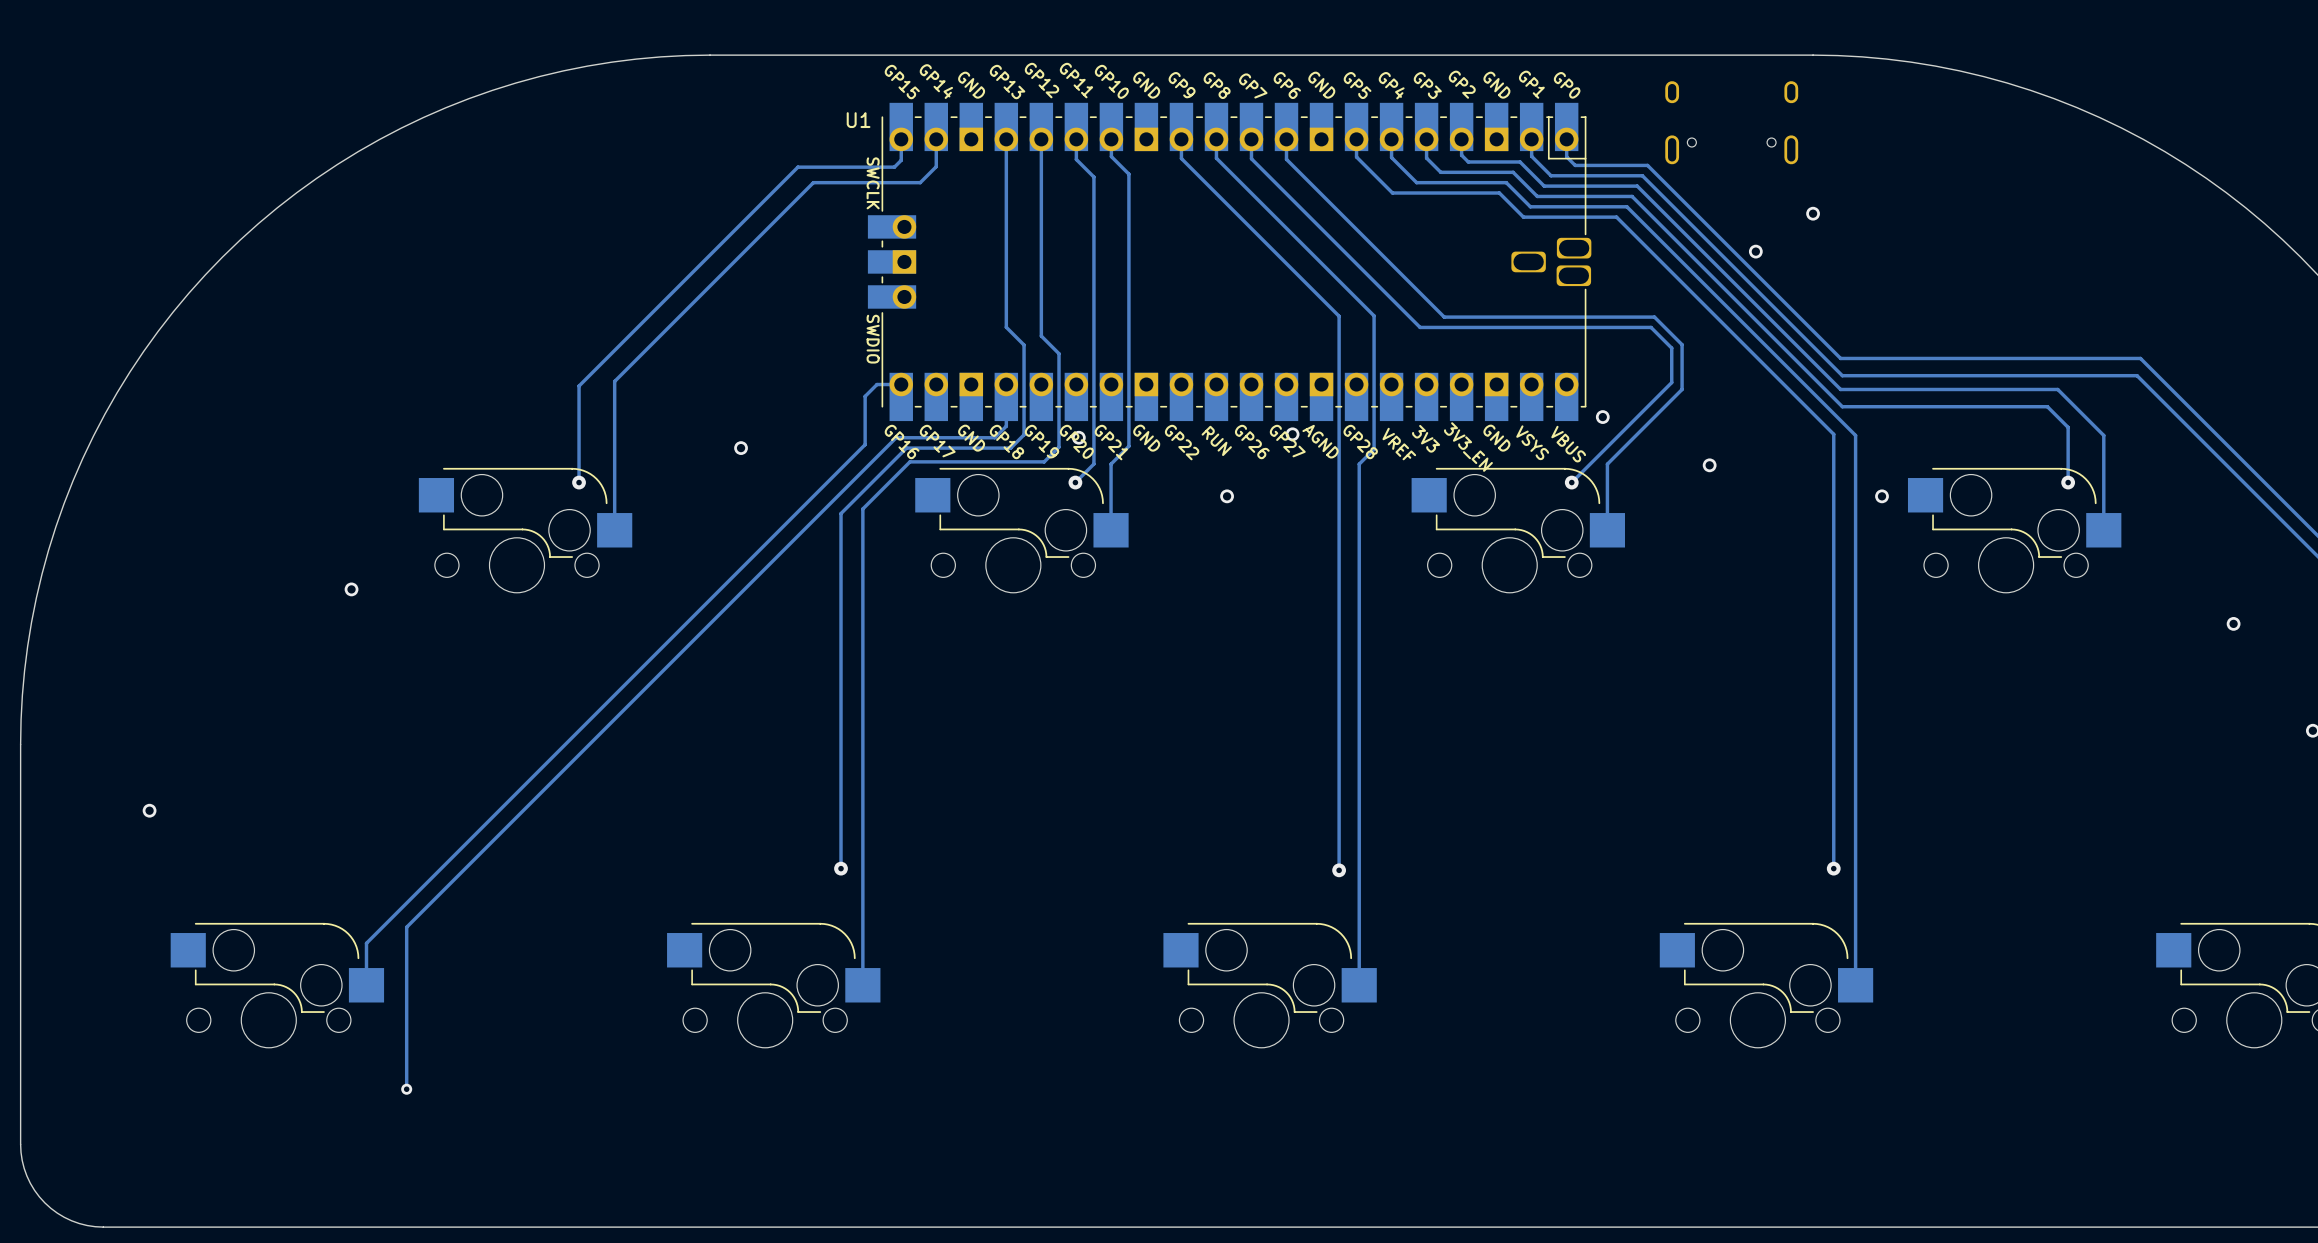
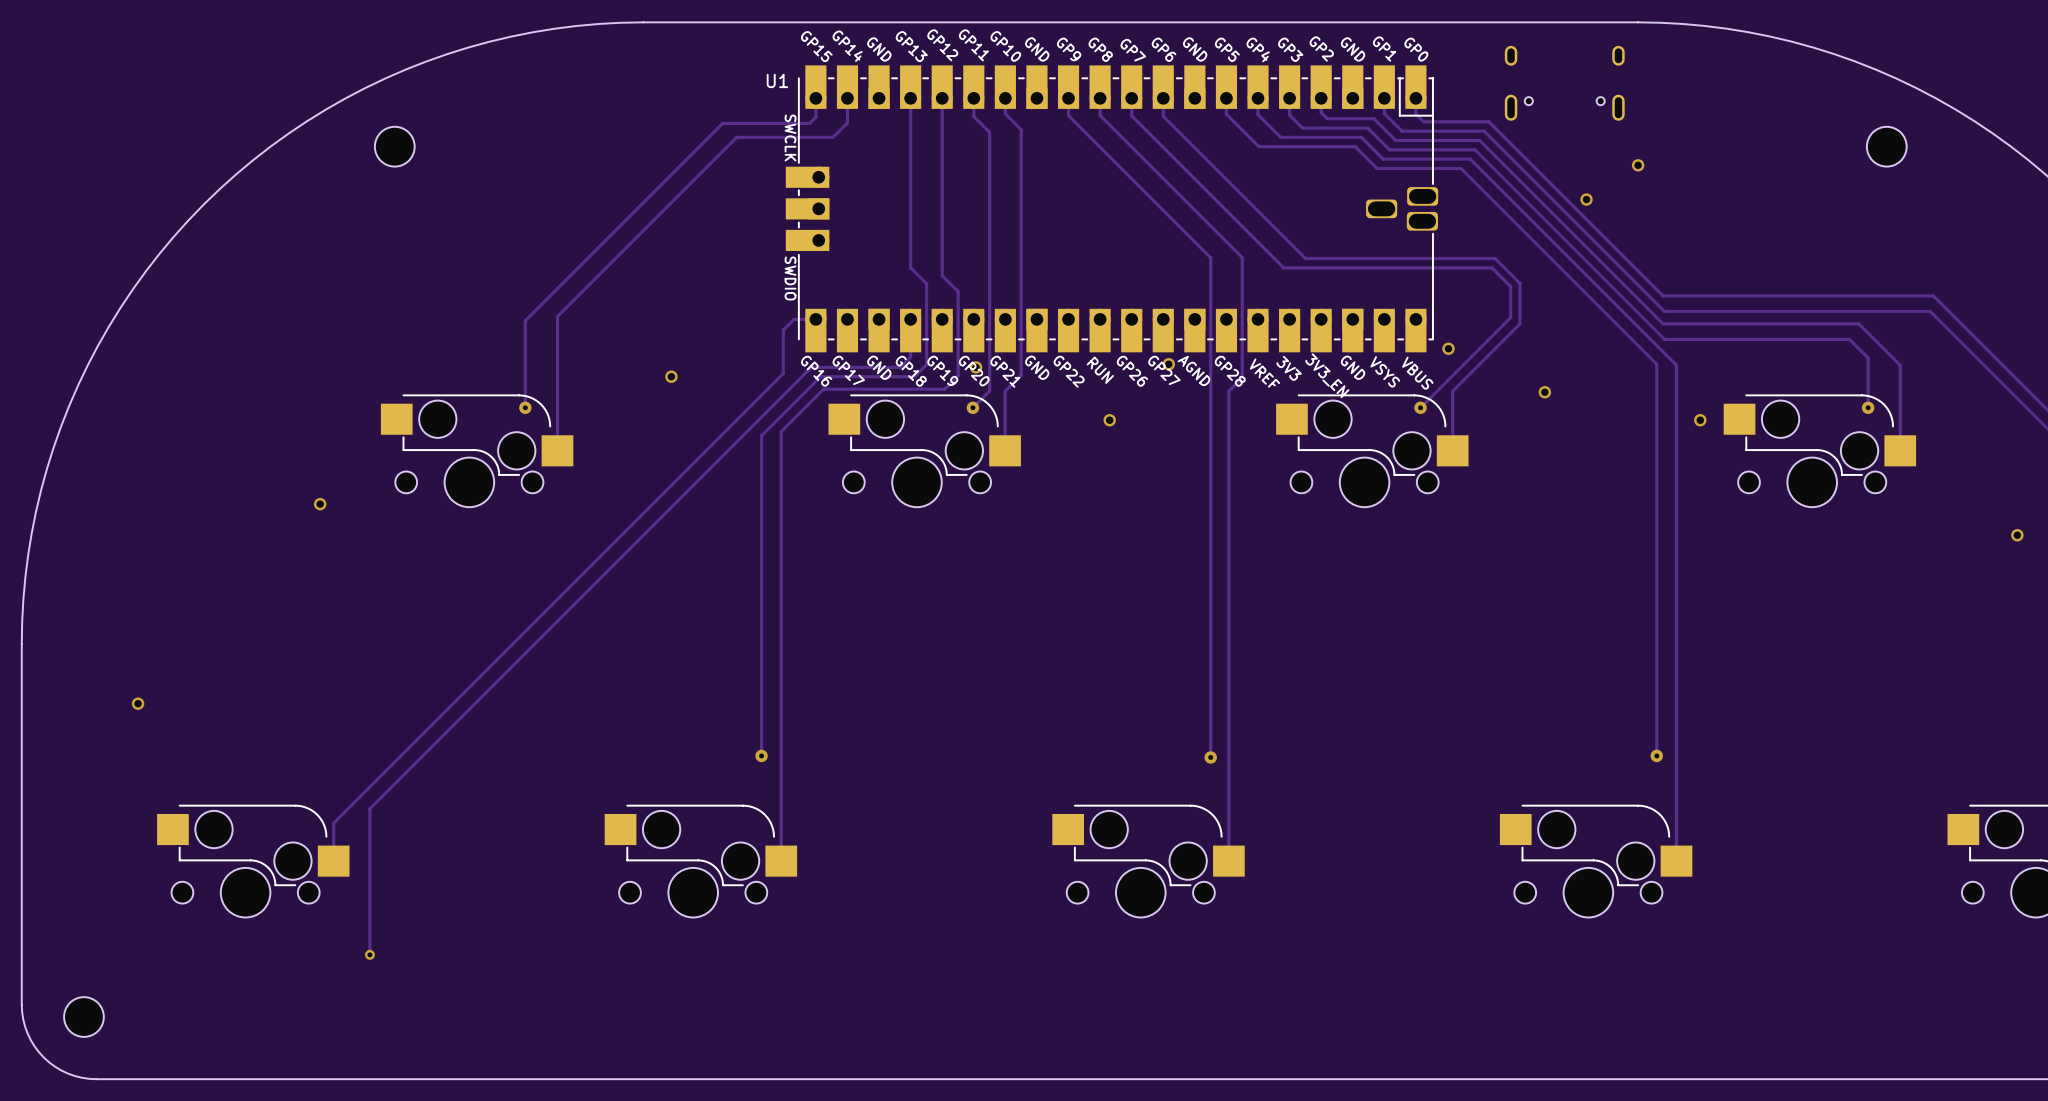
part: none -> (394, 146)
part: none -> (1886, 146)
part: none -> (83, 1017)

